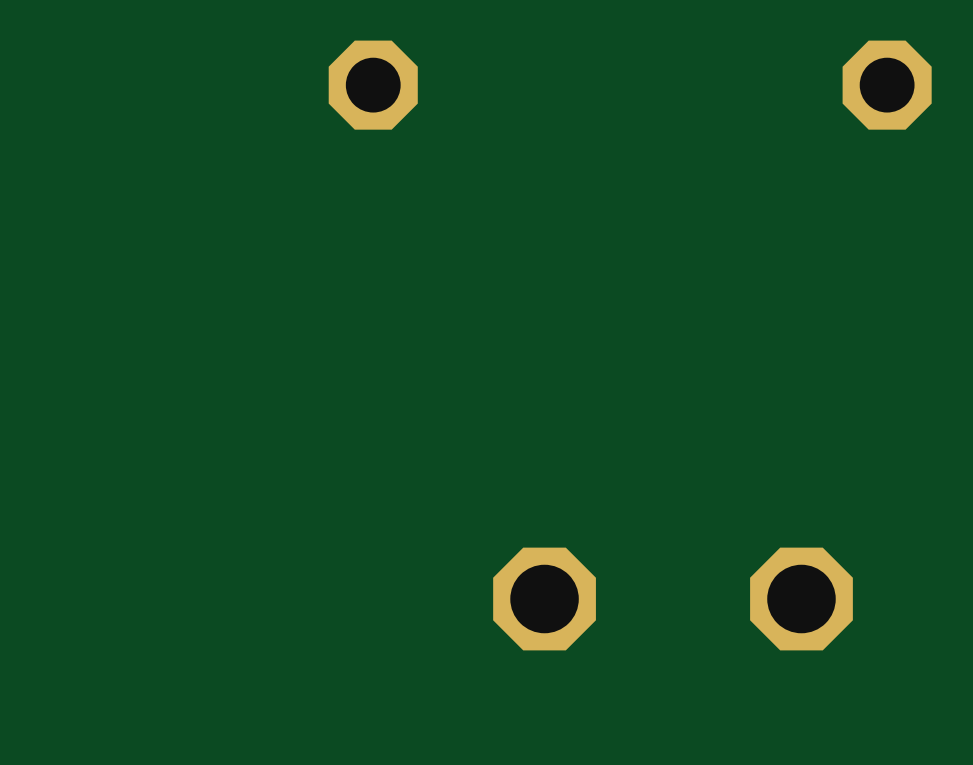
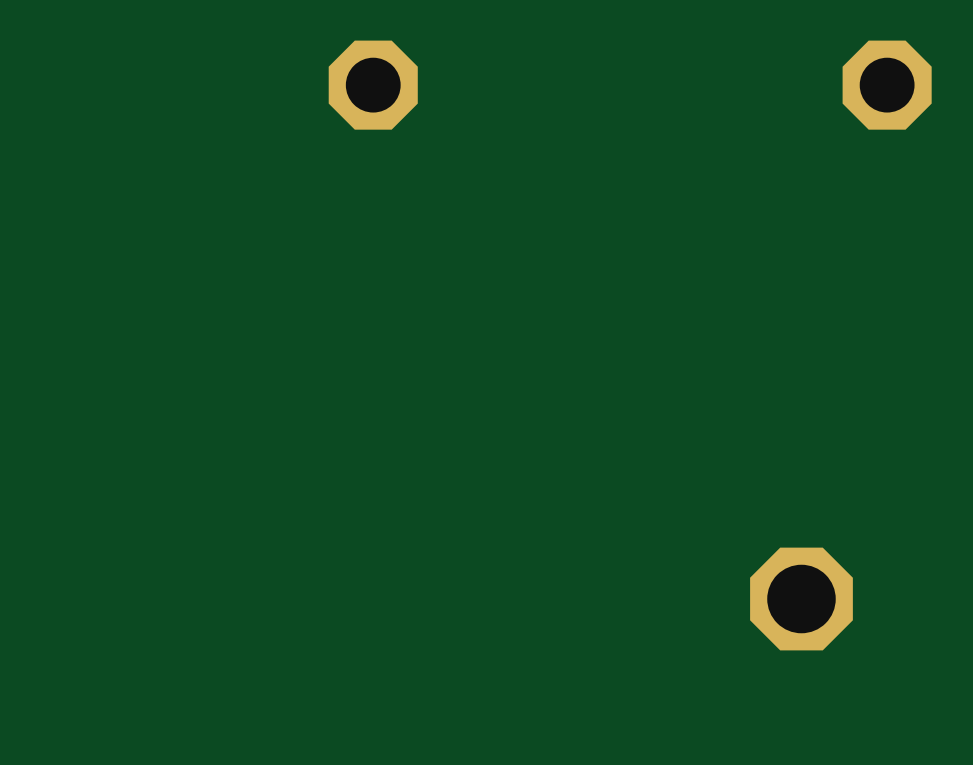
part: (544, 599) -> none

